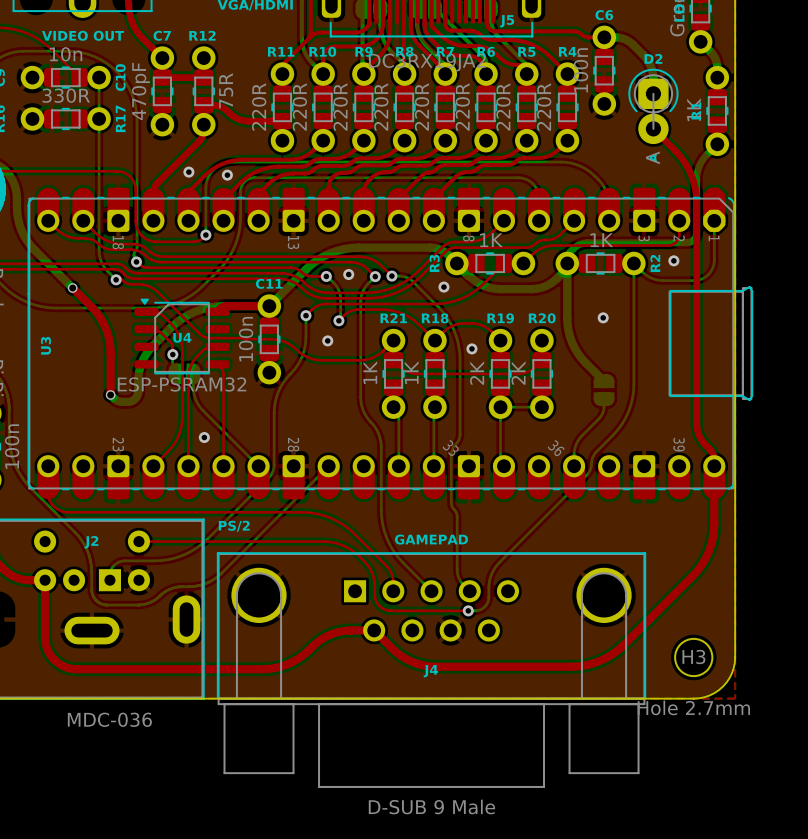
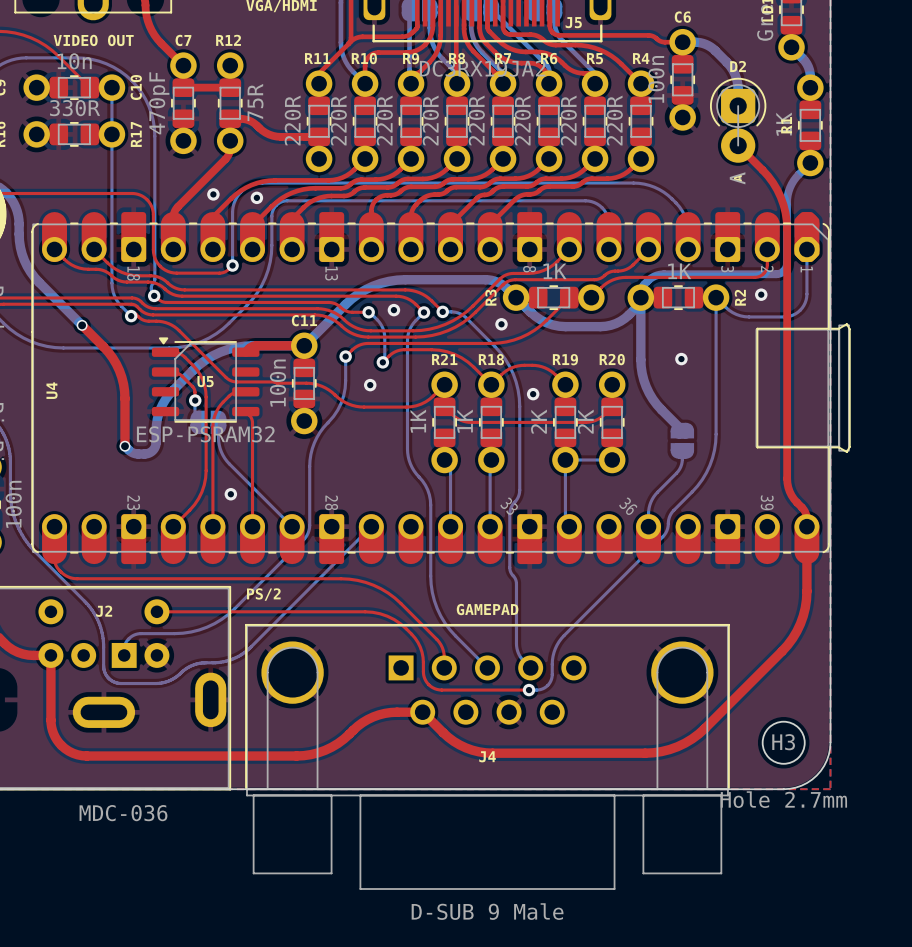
U4 name: U4 (182, 337) -> U5 (205, 381)
U3 name: U3 (45, 345) -> U4 (52, 390)

